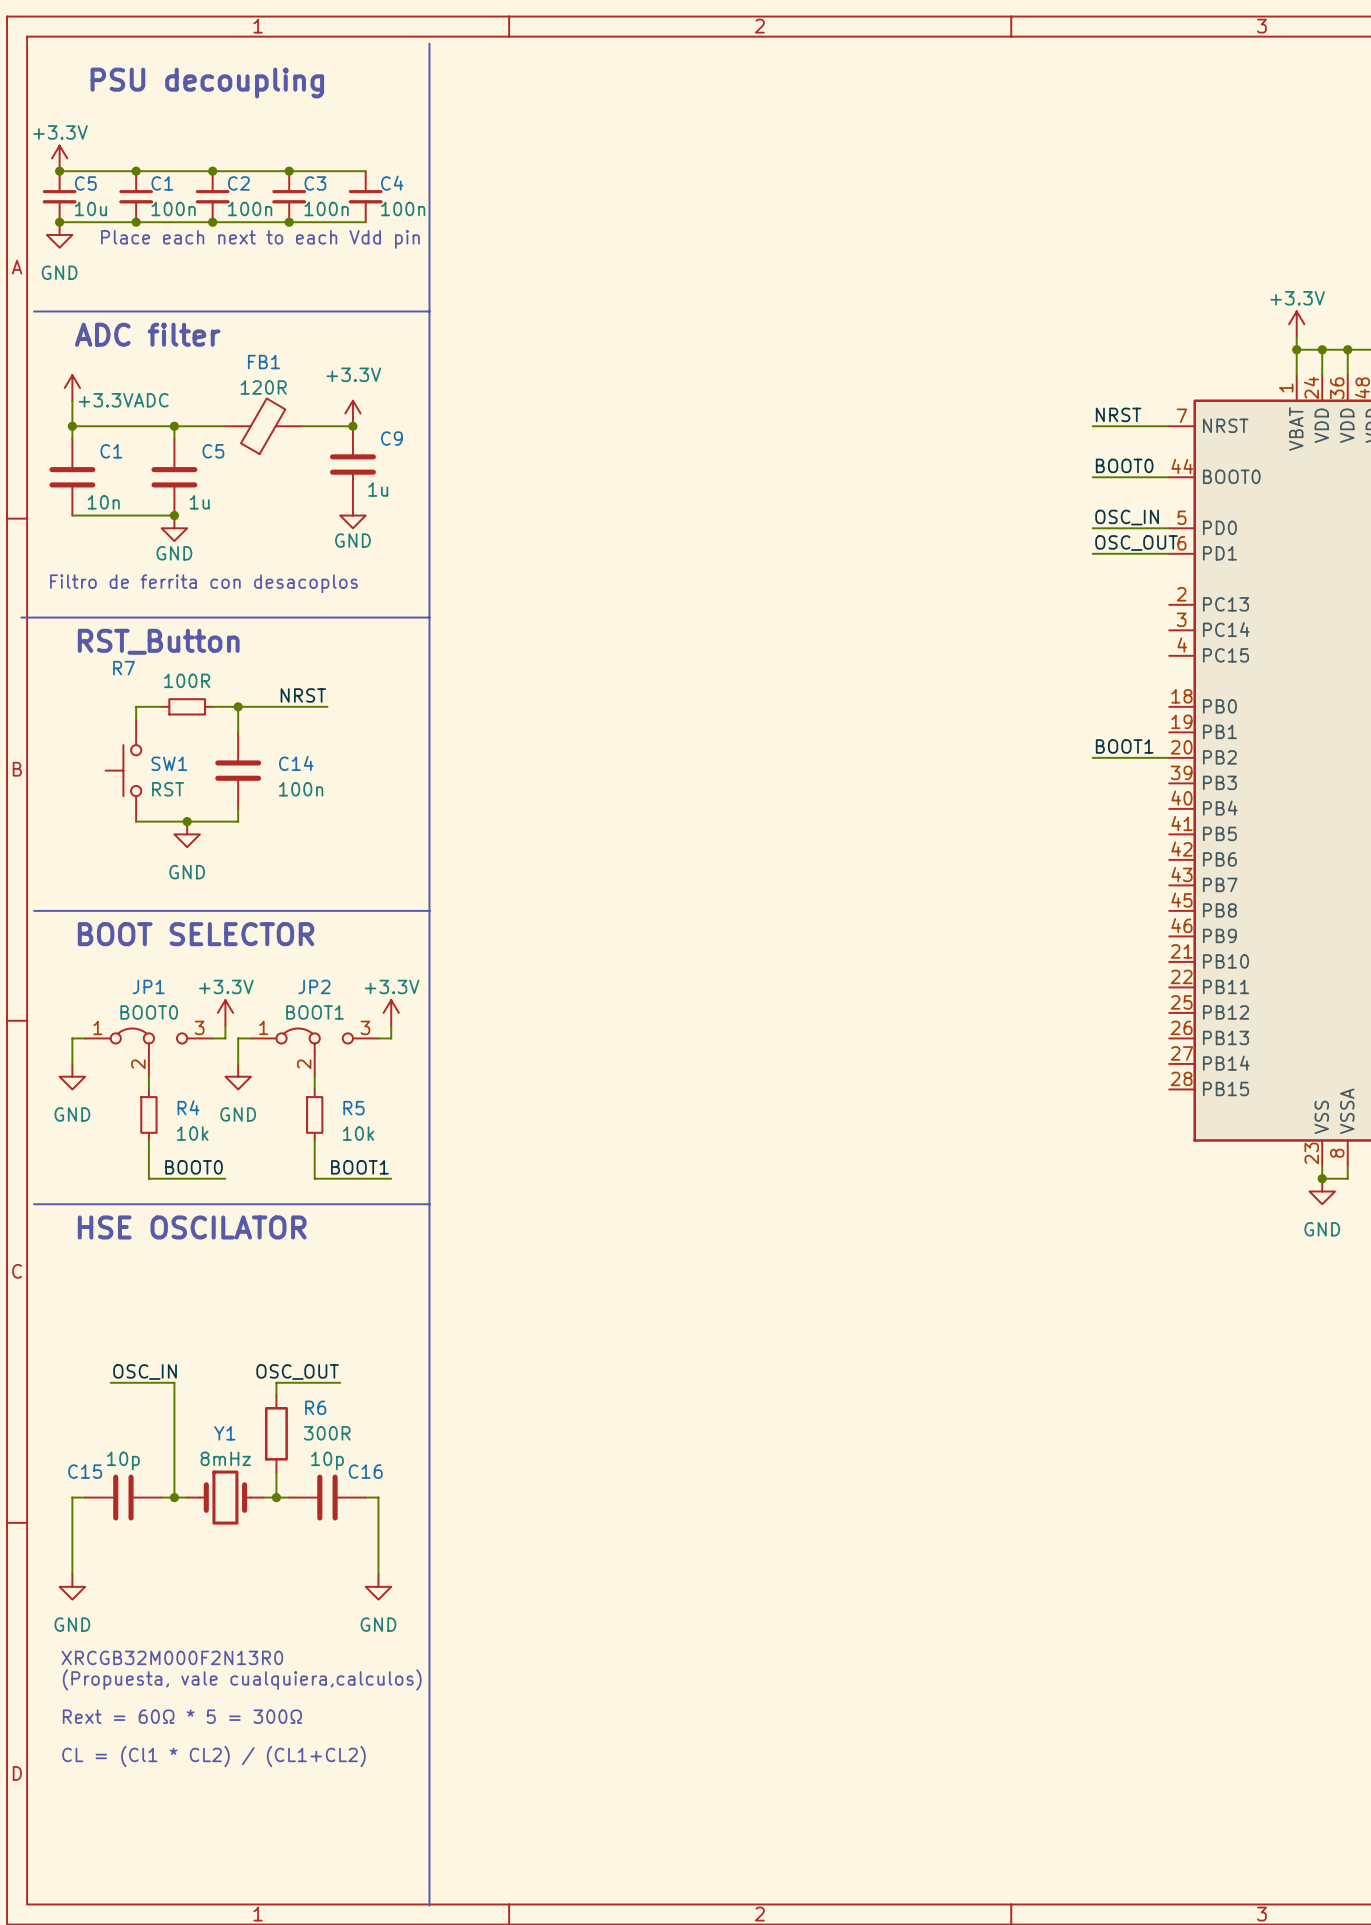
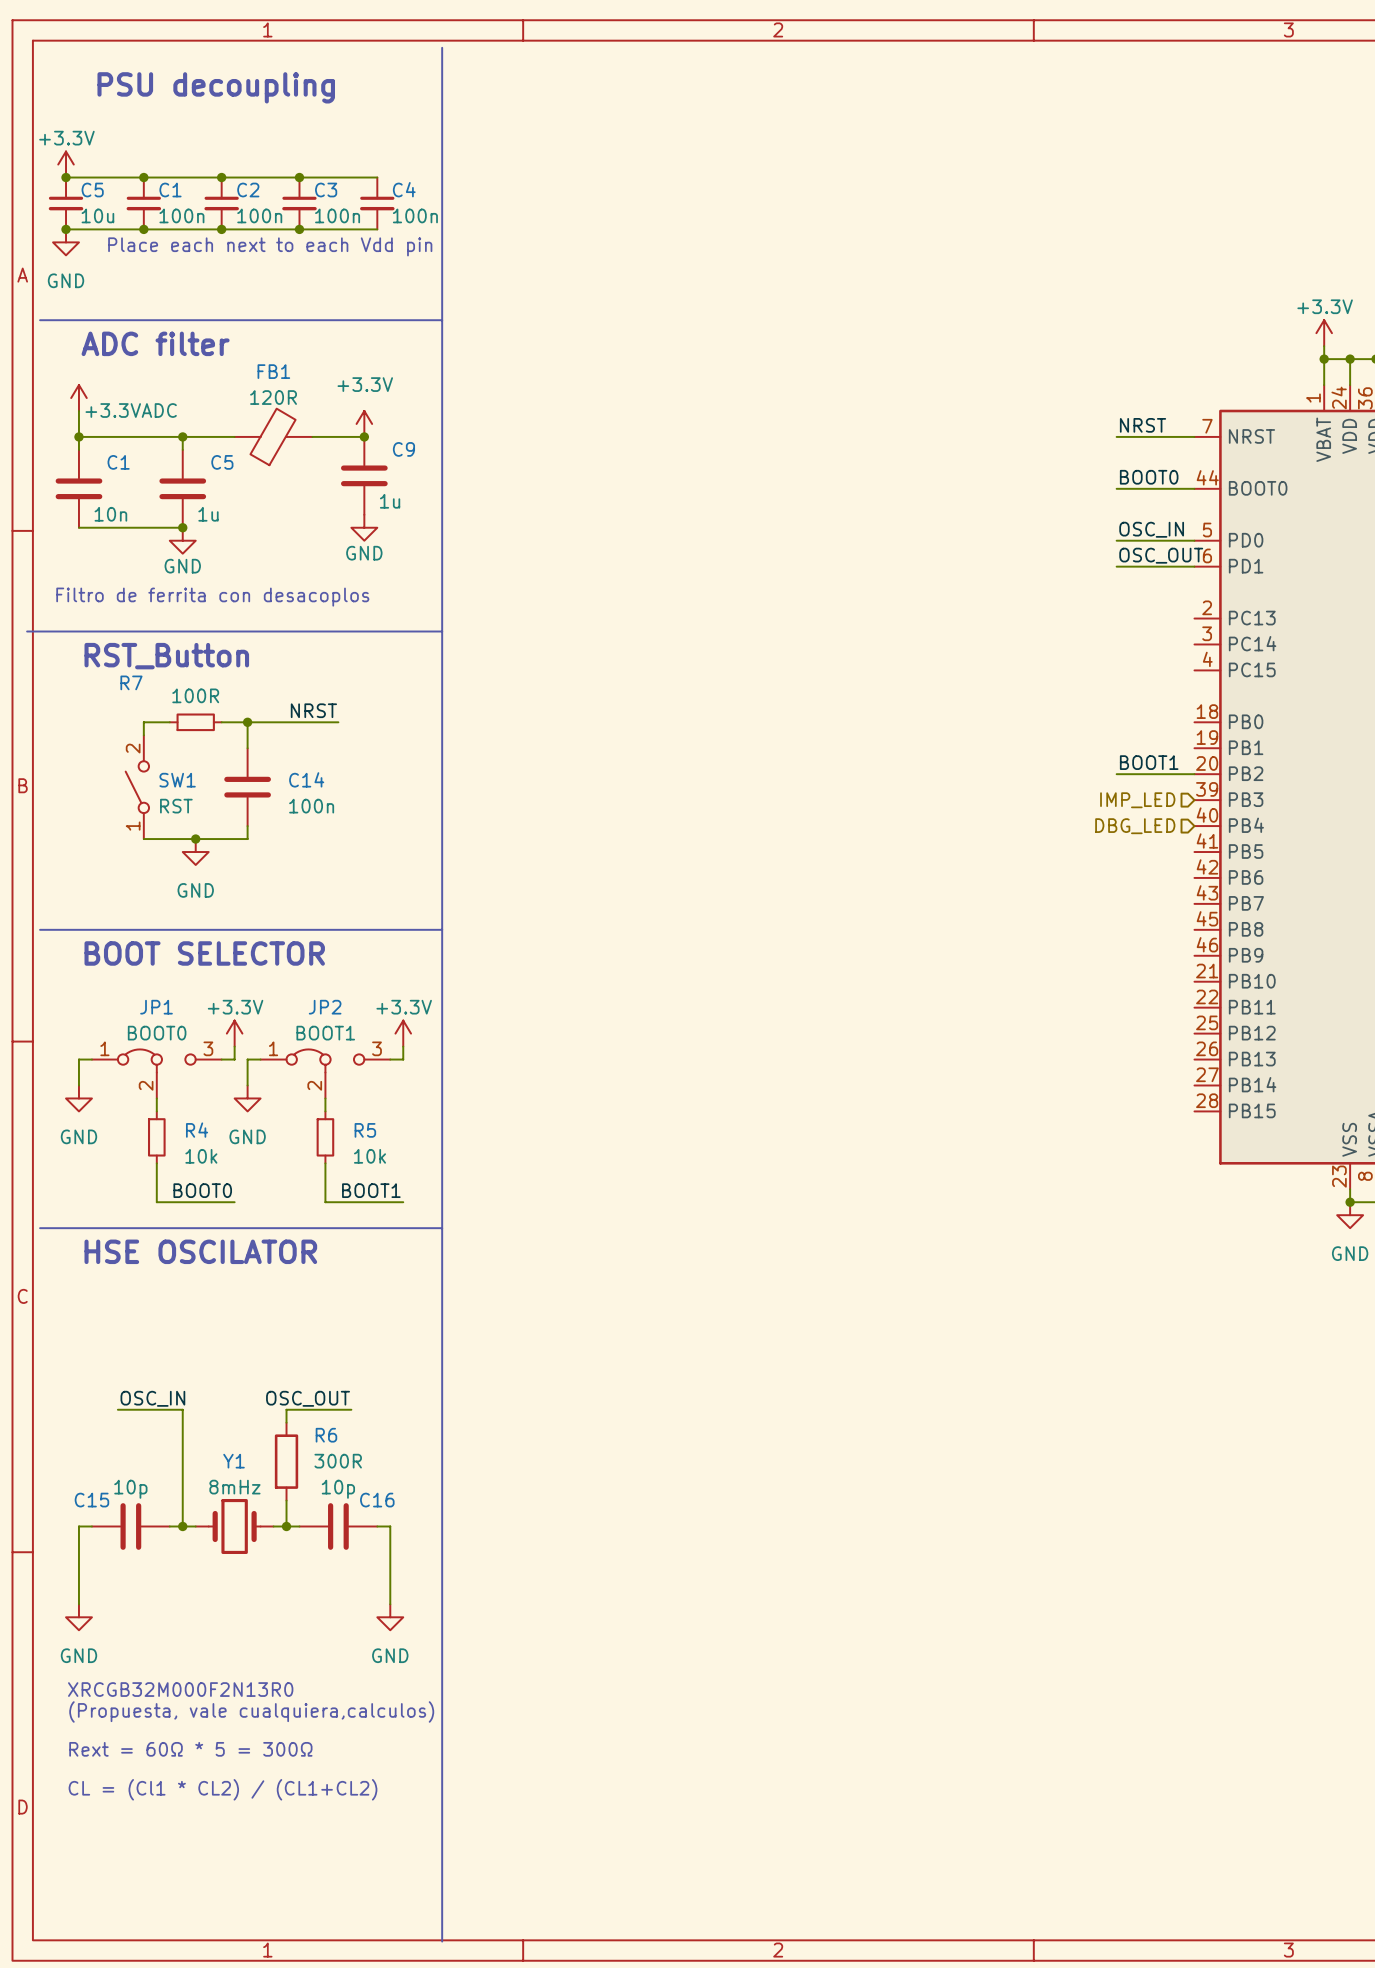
SW1 symbol: [105, 719, 142, 822] -> [125, 735, 150, 840]
hierarchical label: none -> IMP_LED (1137, 800)
hierarchical label: none -> DBG_LED (1135, 826)

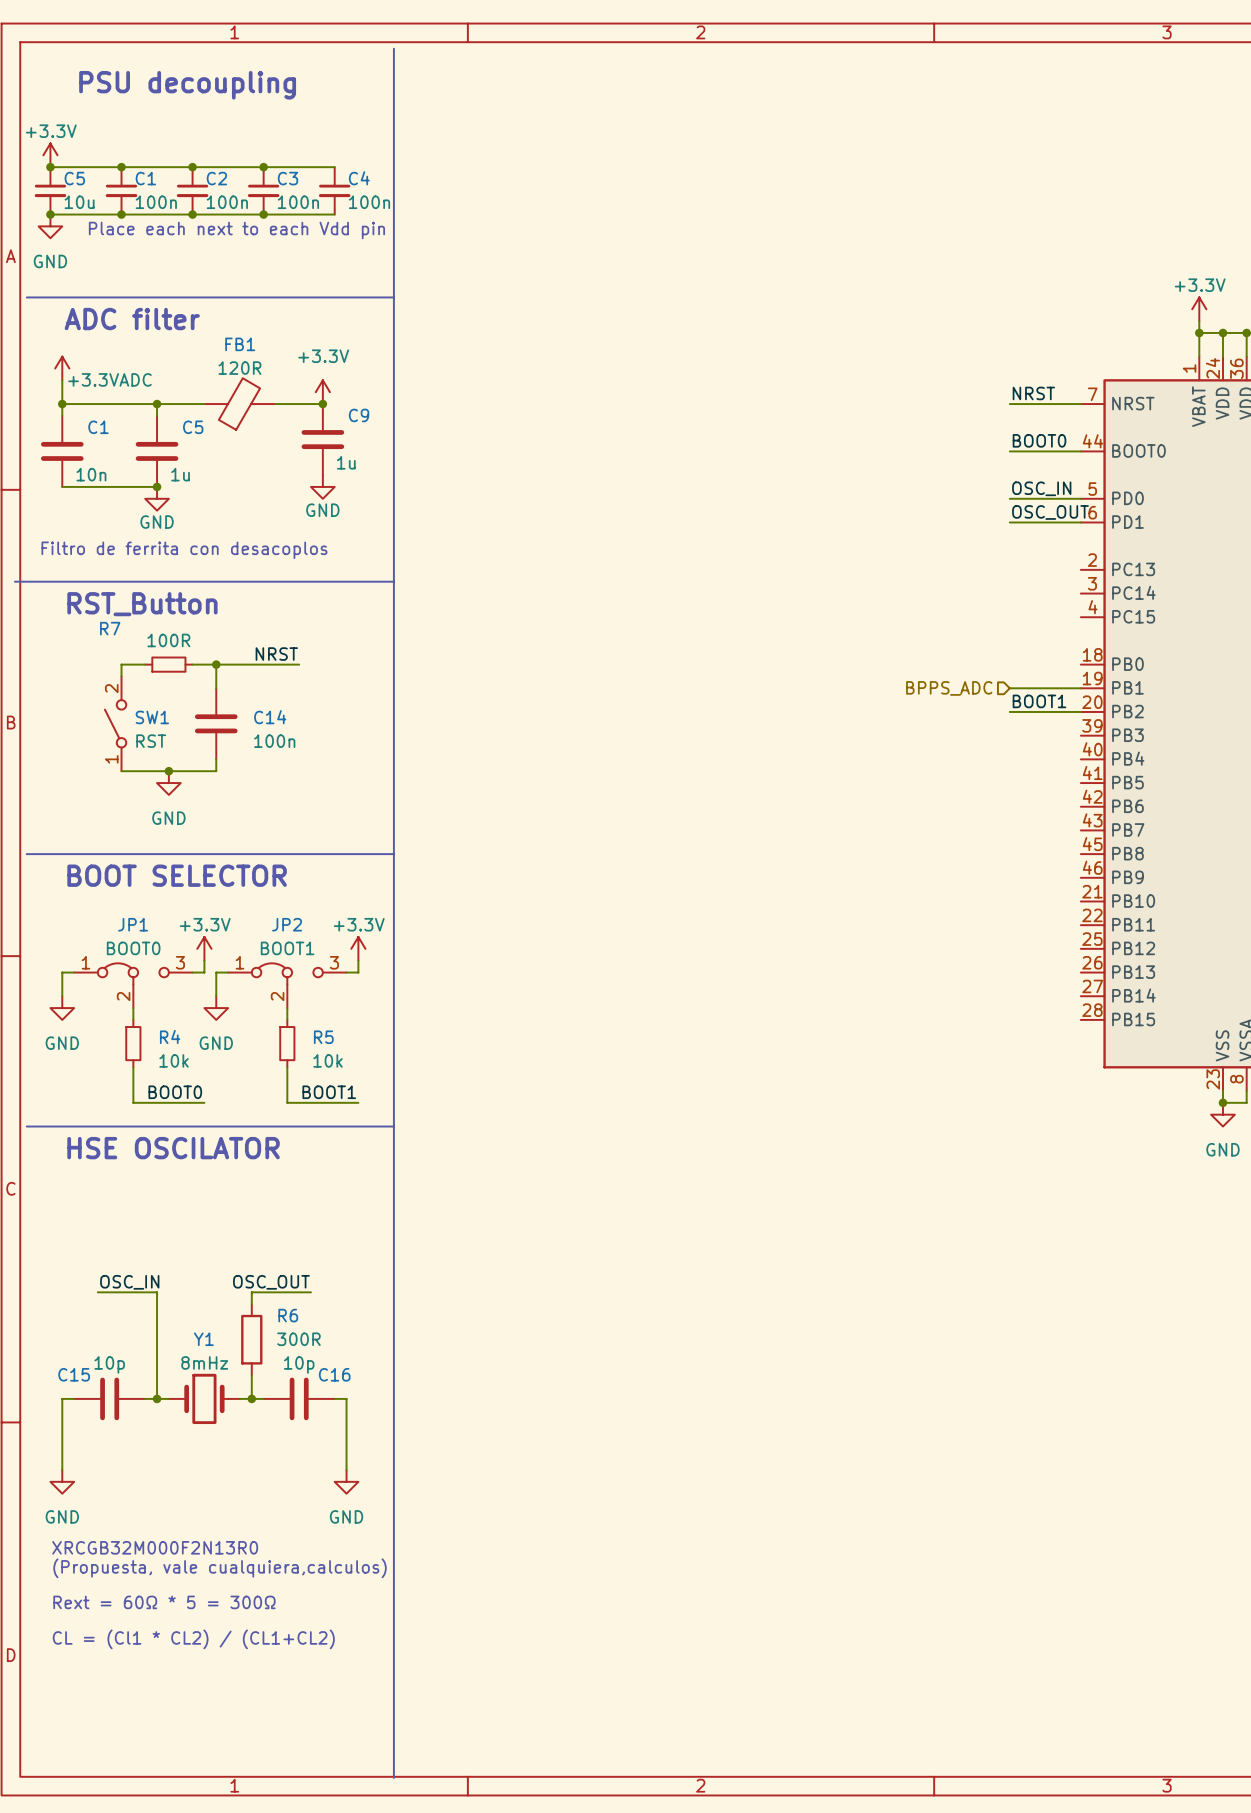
hierarchical label: none -> BPPS_ADC (949, 688)
wire: none -> (1009, 688) (1080, 688)
hierarchical label: IMP_LED (1137, 800) -> none
hierarchical label: DBG_LED (1135, 826) -> none

